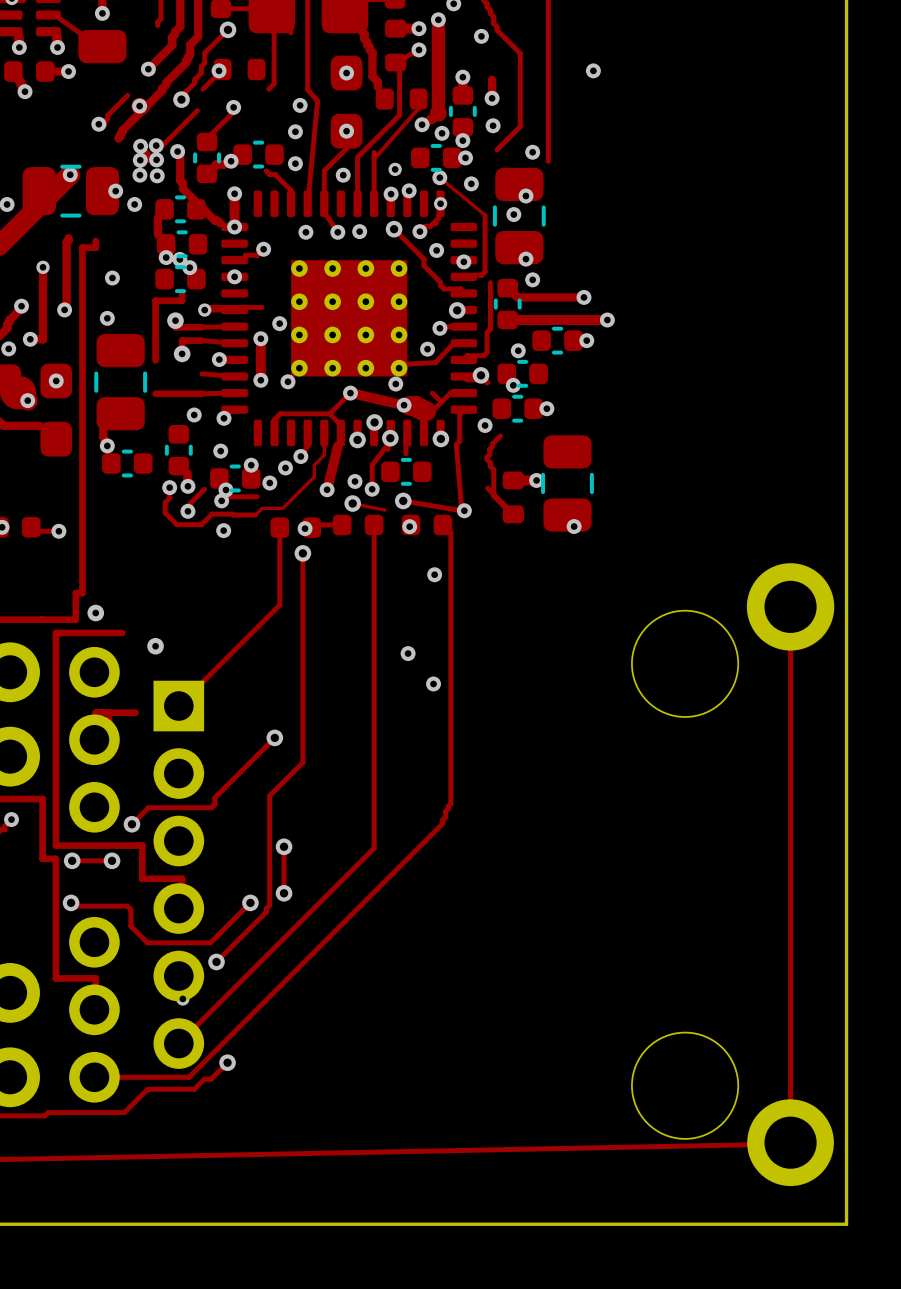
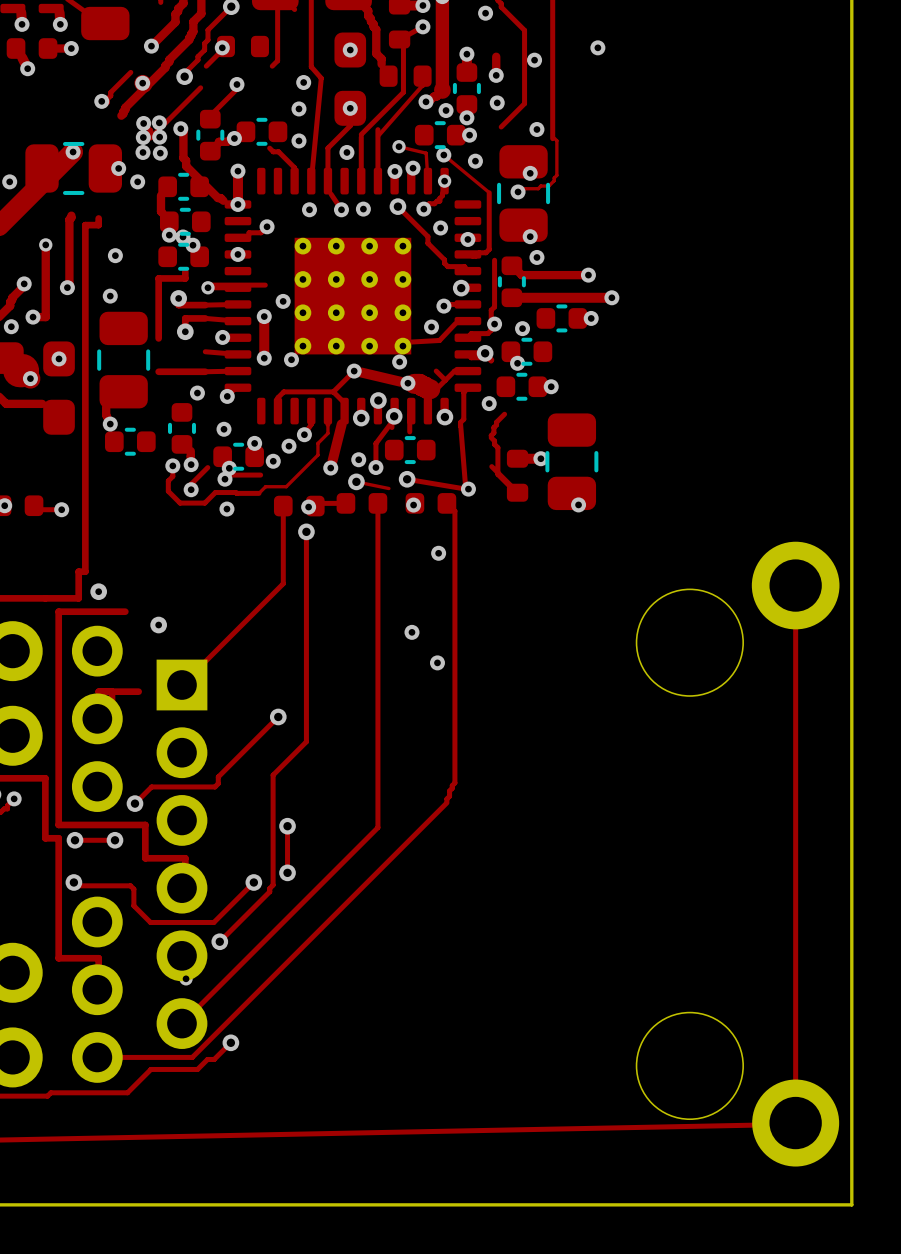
via: none -> (534, 60)
track: none -> (554, 138) (556, 140) (556, 175) (554, 180) (548, 186) (524, 189)
track: none -> (399, 146) (426, 153) (427, 181)
via: none -> (494, 324)

